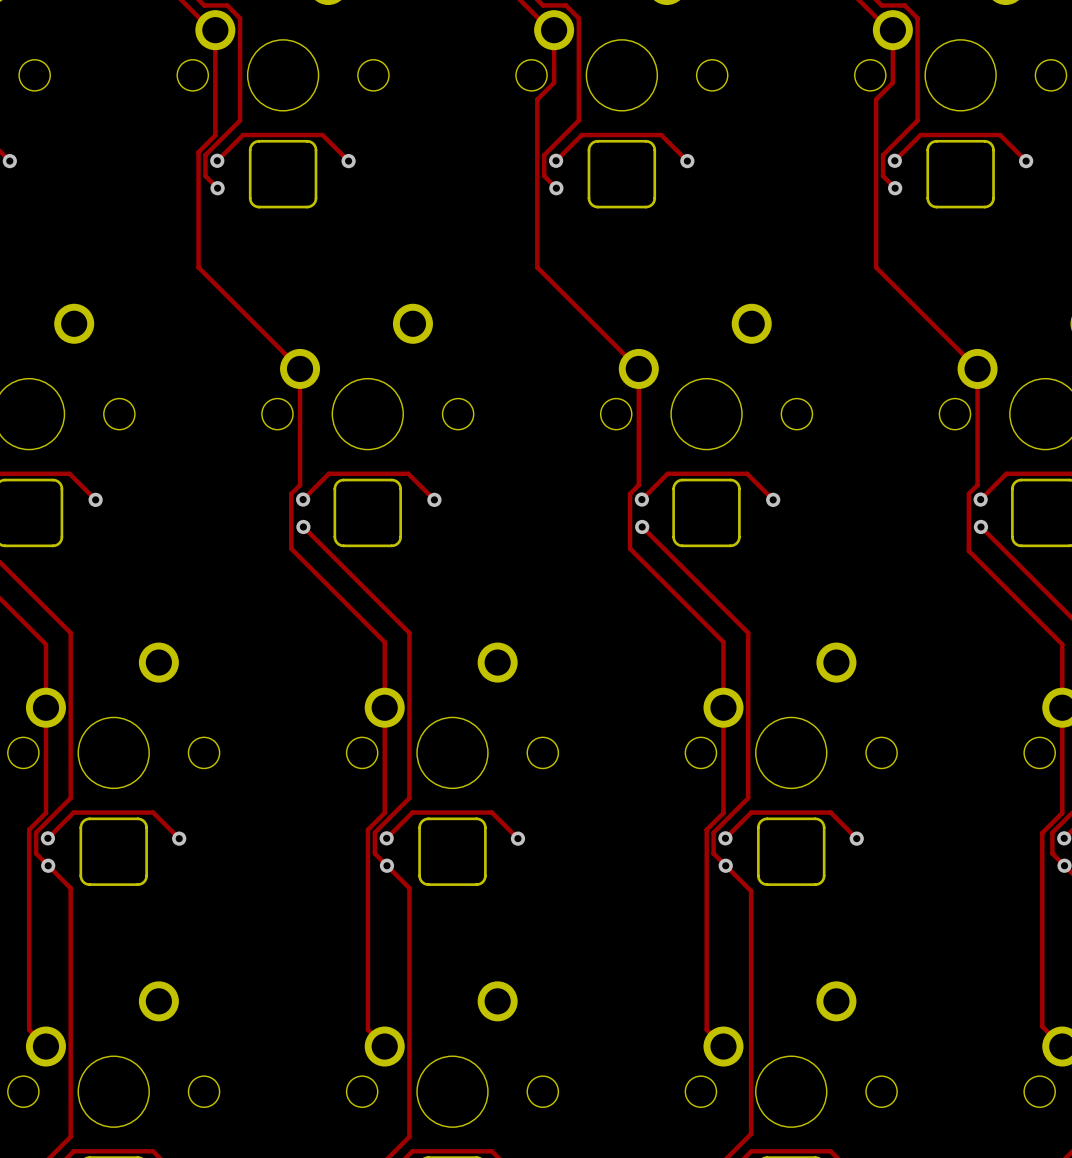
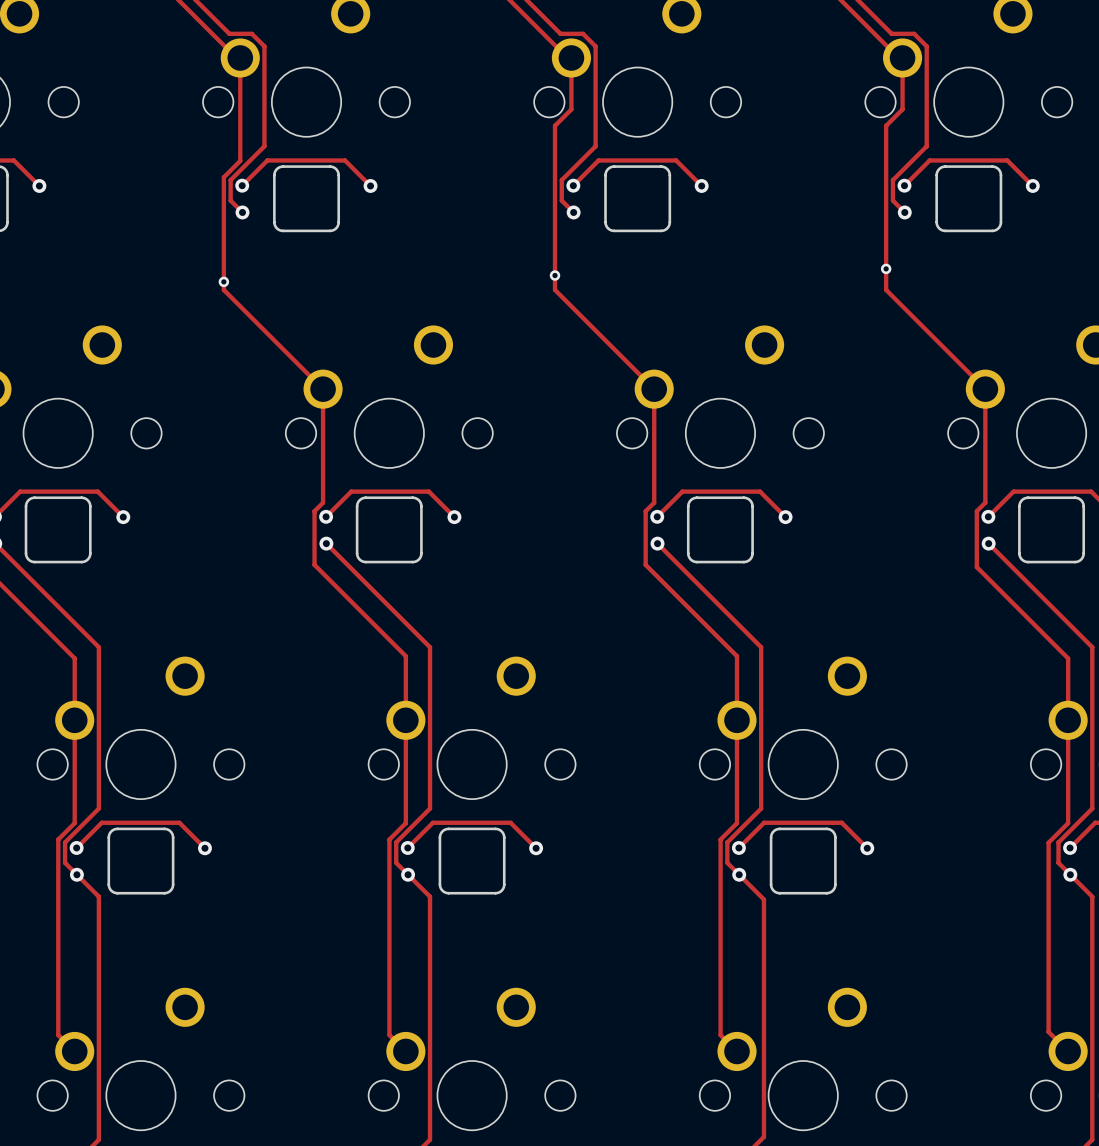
via: none -> (886, 268)
via: none -> (555, 275)
via: none -> (223, 281)

